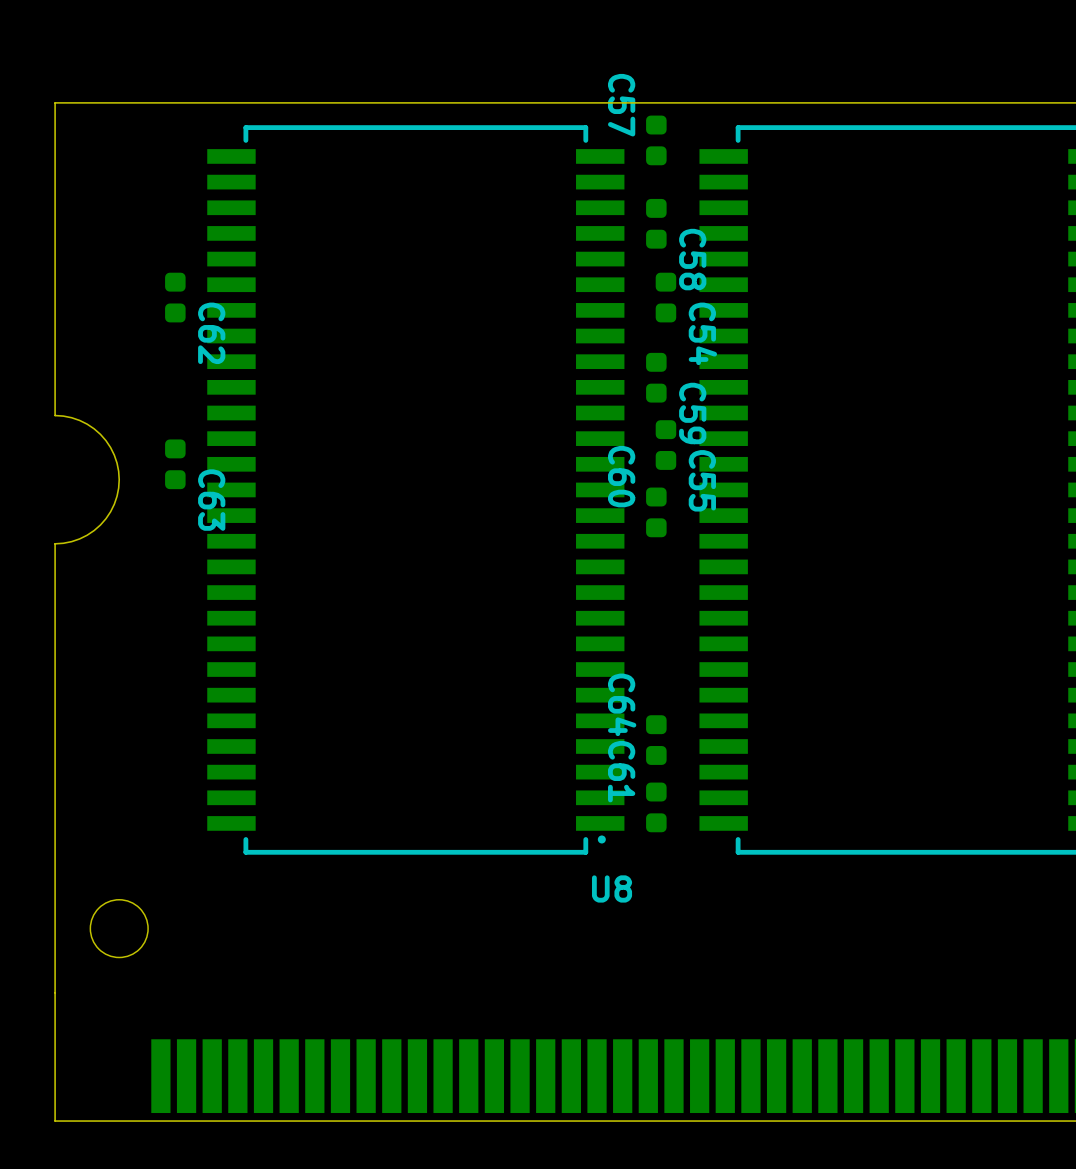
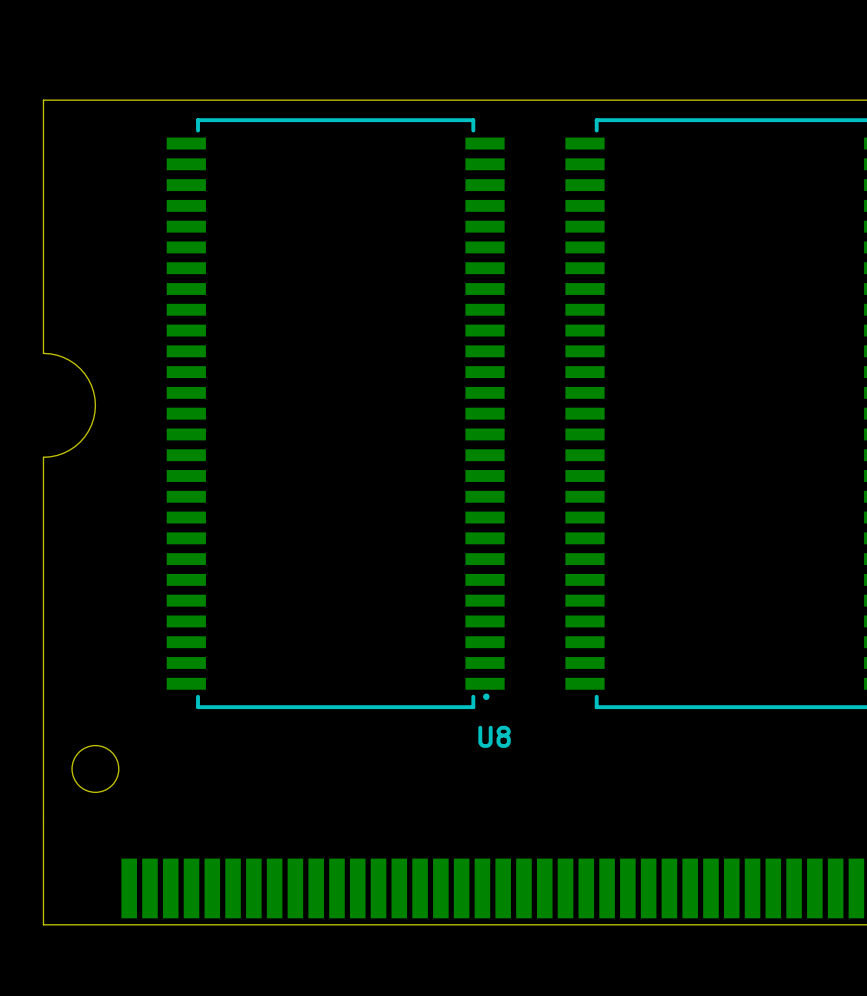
C57: (656, 140) -> none
C58: (656, 223) -> none
C62: (175, 297) -> none
C54: (665, 297) -> none
C59: (656, 377) -> none
C55: (665, 445) -> none
C63: (175, 464) -> none
C60: (656, 512) -> none
C64: (656, 740) -> none
C61: (656, 807) -> none

